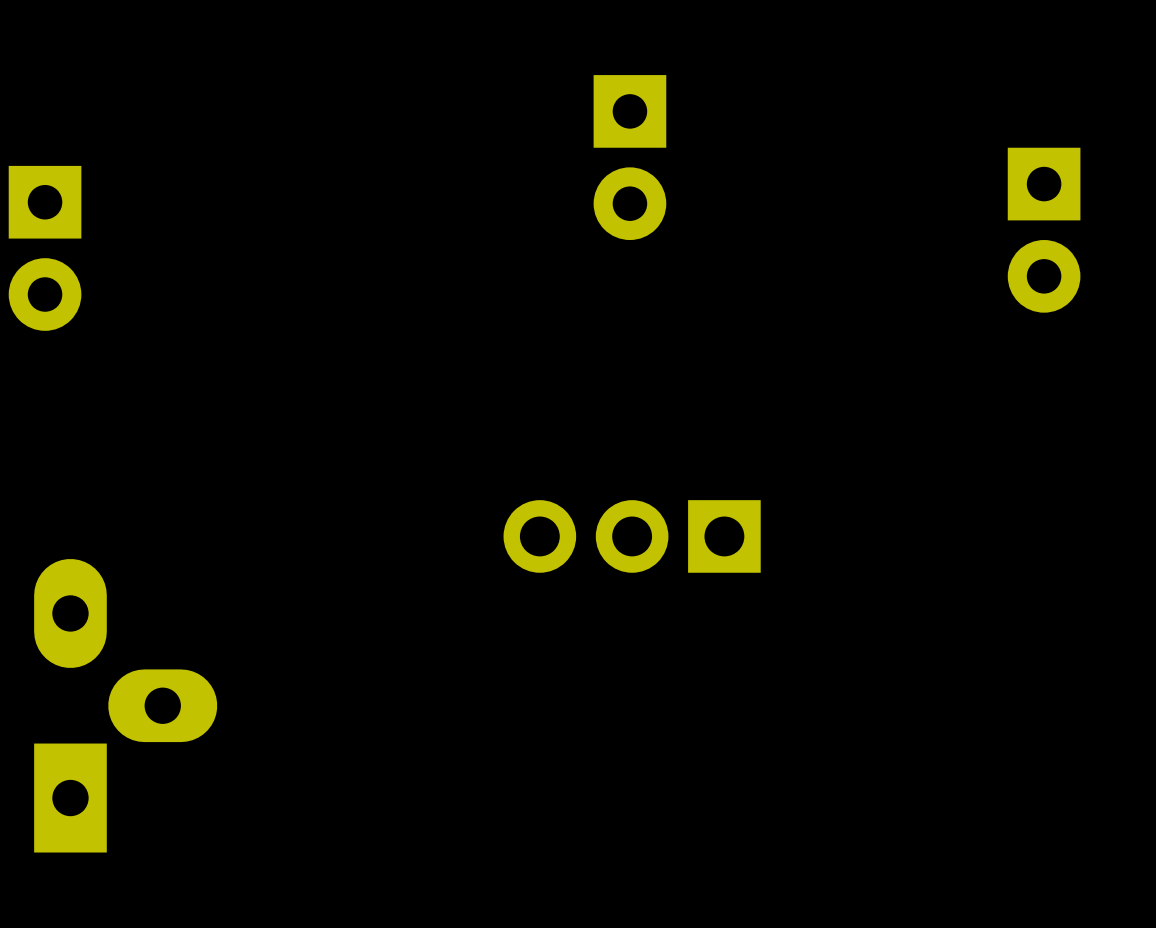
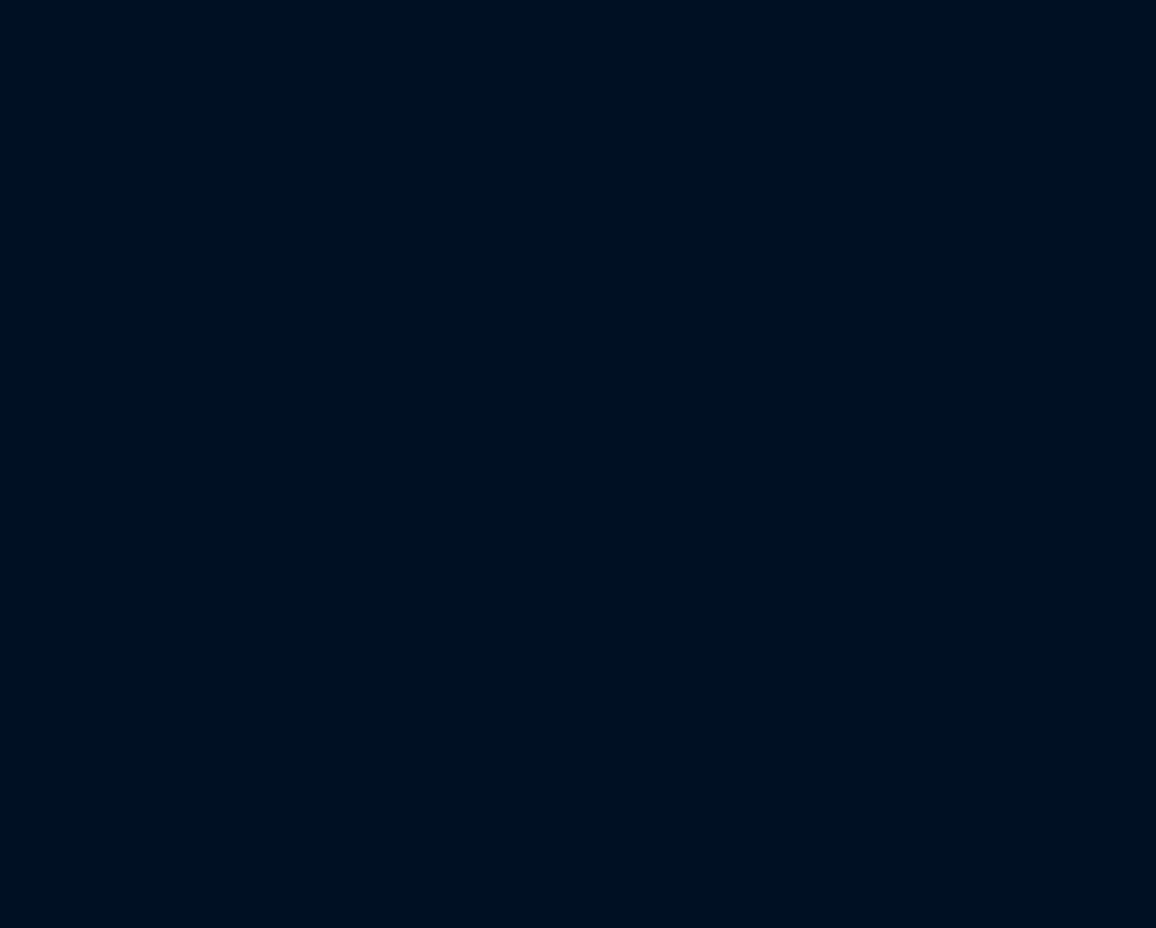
part: (629, 157) -> none
part: (1044, 230) -> none
part: (45, 248) -> none
part: (632, 536) -> none
part: (125, 705) -> none

